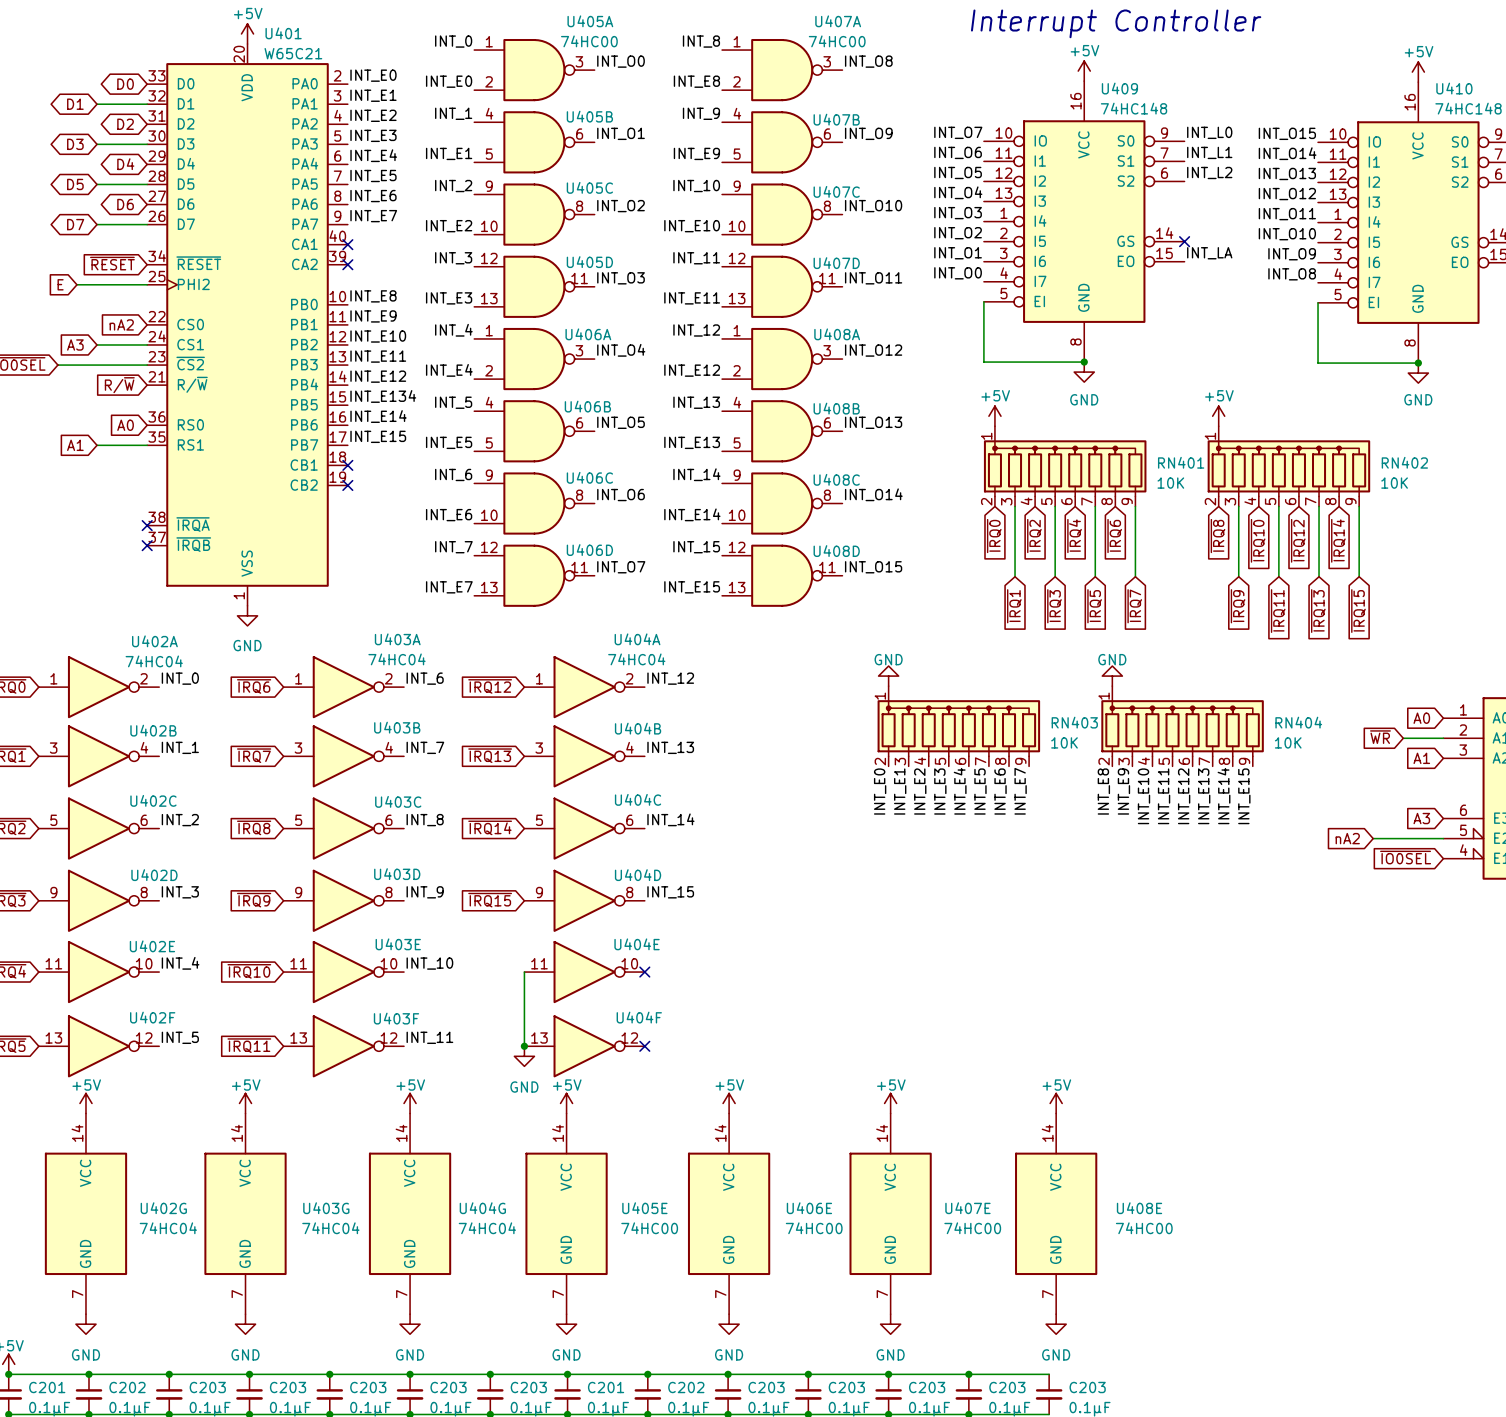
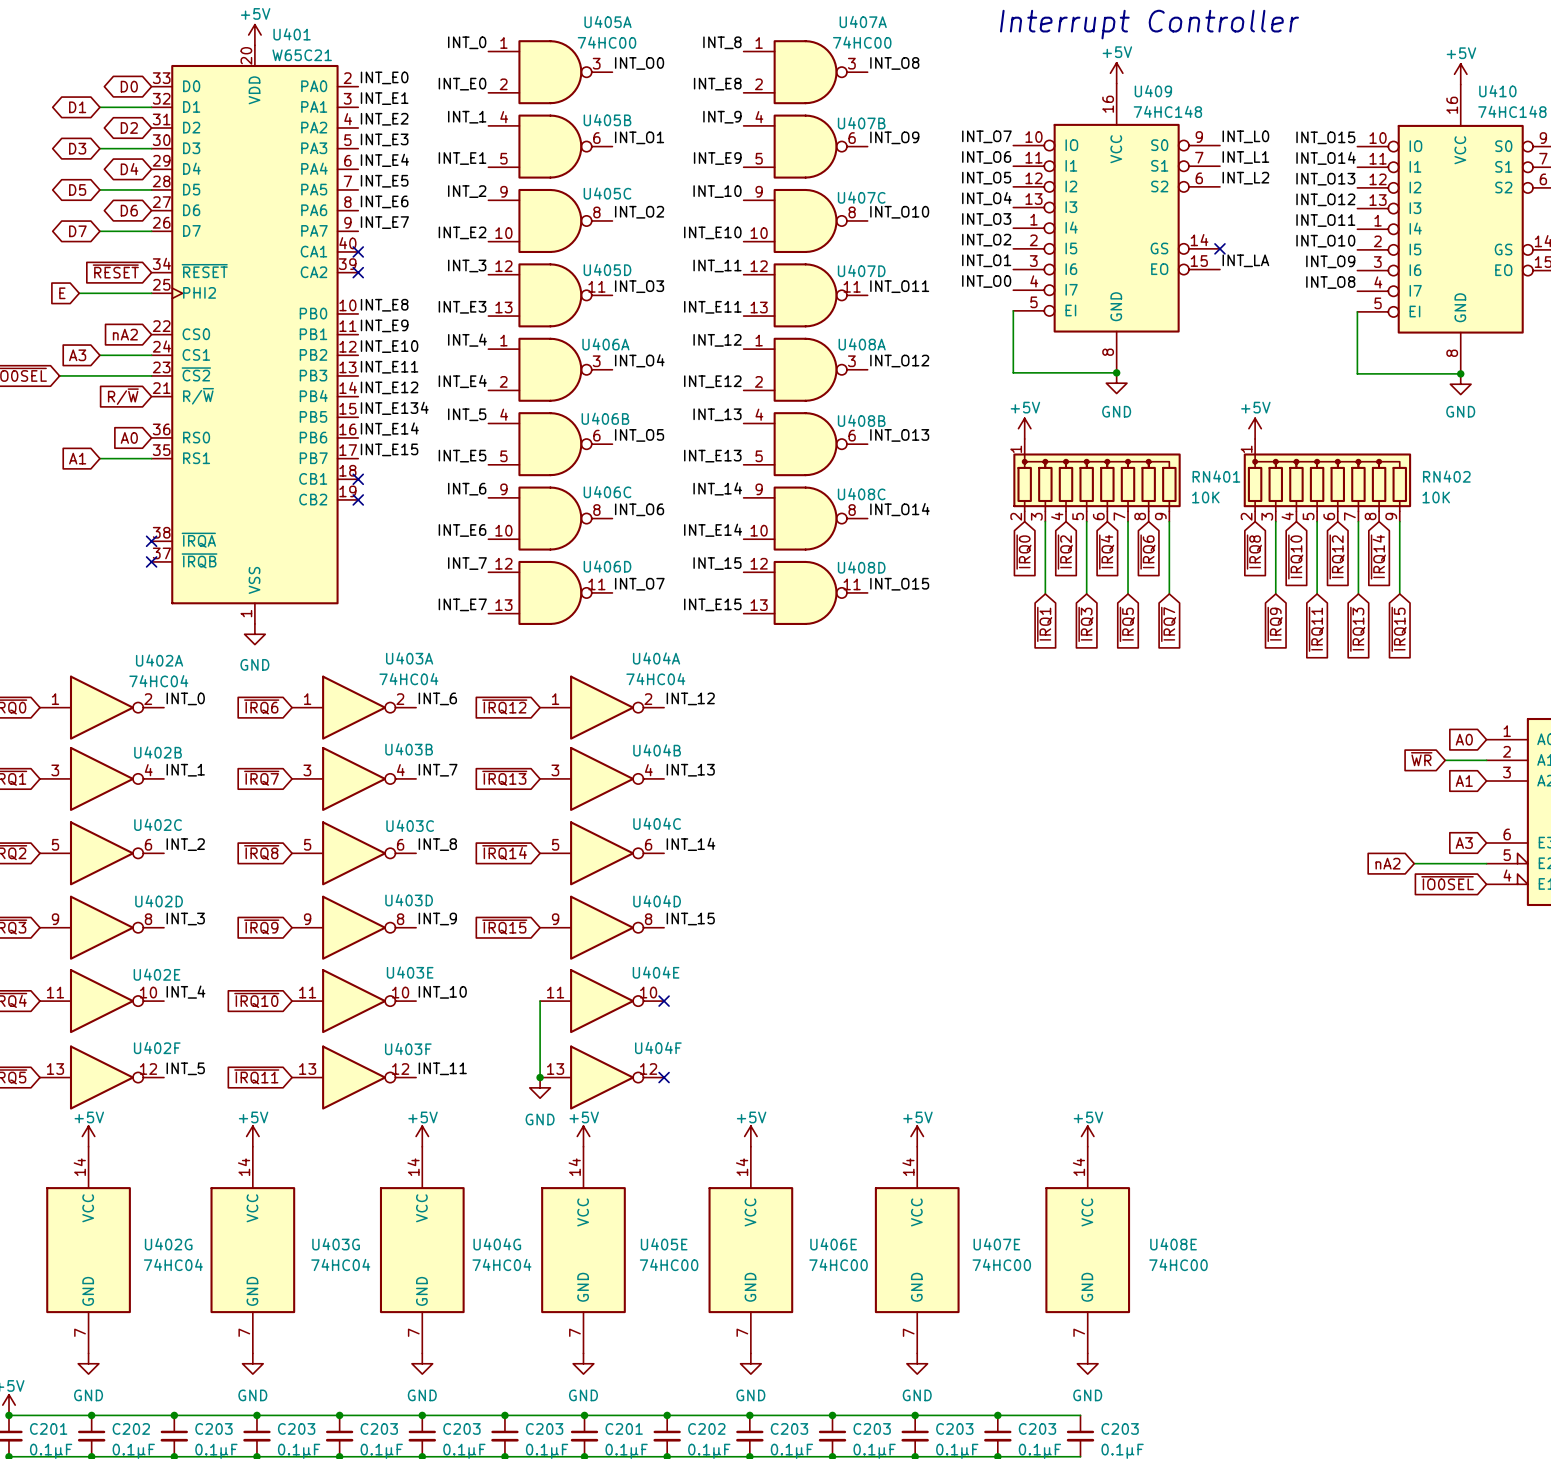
power symbol: GND (888, 676) -> none
power symbol: GND (1112, 676) -> none
RN403: 10K (958, 726) -> none
RN404: 10K (1182, 726) -> none
label: INT_E0 (880, 791) -> none
label: INT_E1 (900, 791) -> none
label: INT_E2 (920, 791) -> none
label: INT_E3 (940, 791) -> none
label: INT_E4 (960, 791) -> none
label: INT_E5 (980, 791) -> none
label: INT_E6 (1000, 791) -> none
label: INT_E7 (1020, 791) -> none
label: INT_E8 (1103, 791) -> none
label: INT_E9 (1123, 791) -> none
label: INT_E10 (1144, 796) -> none
label: INT_E11 (1164, 796) -> none
label: INT_E12 (1184, 796) -> none
label: INT_E13 (1204, 796) -> none
label: INT_E14 (1224, 796) -> none
label: INT_E15 (1244, 796) -> none

